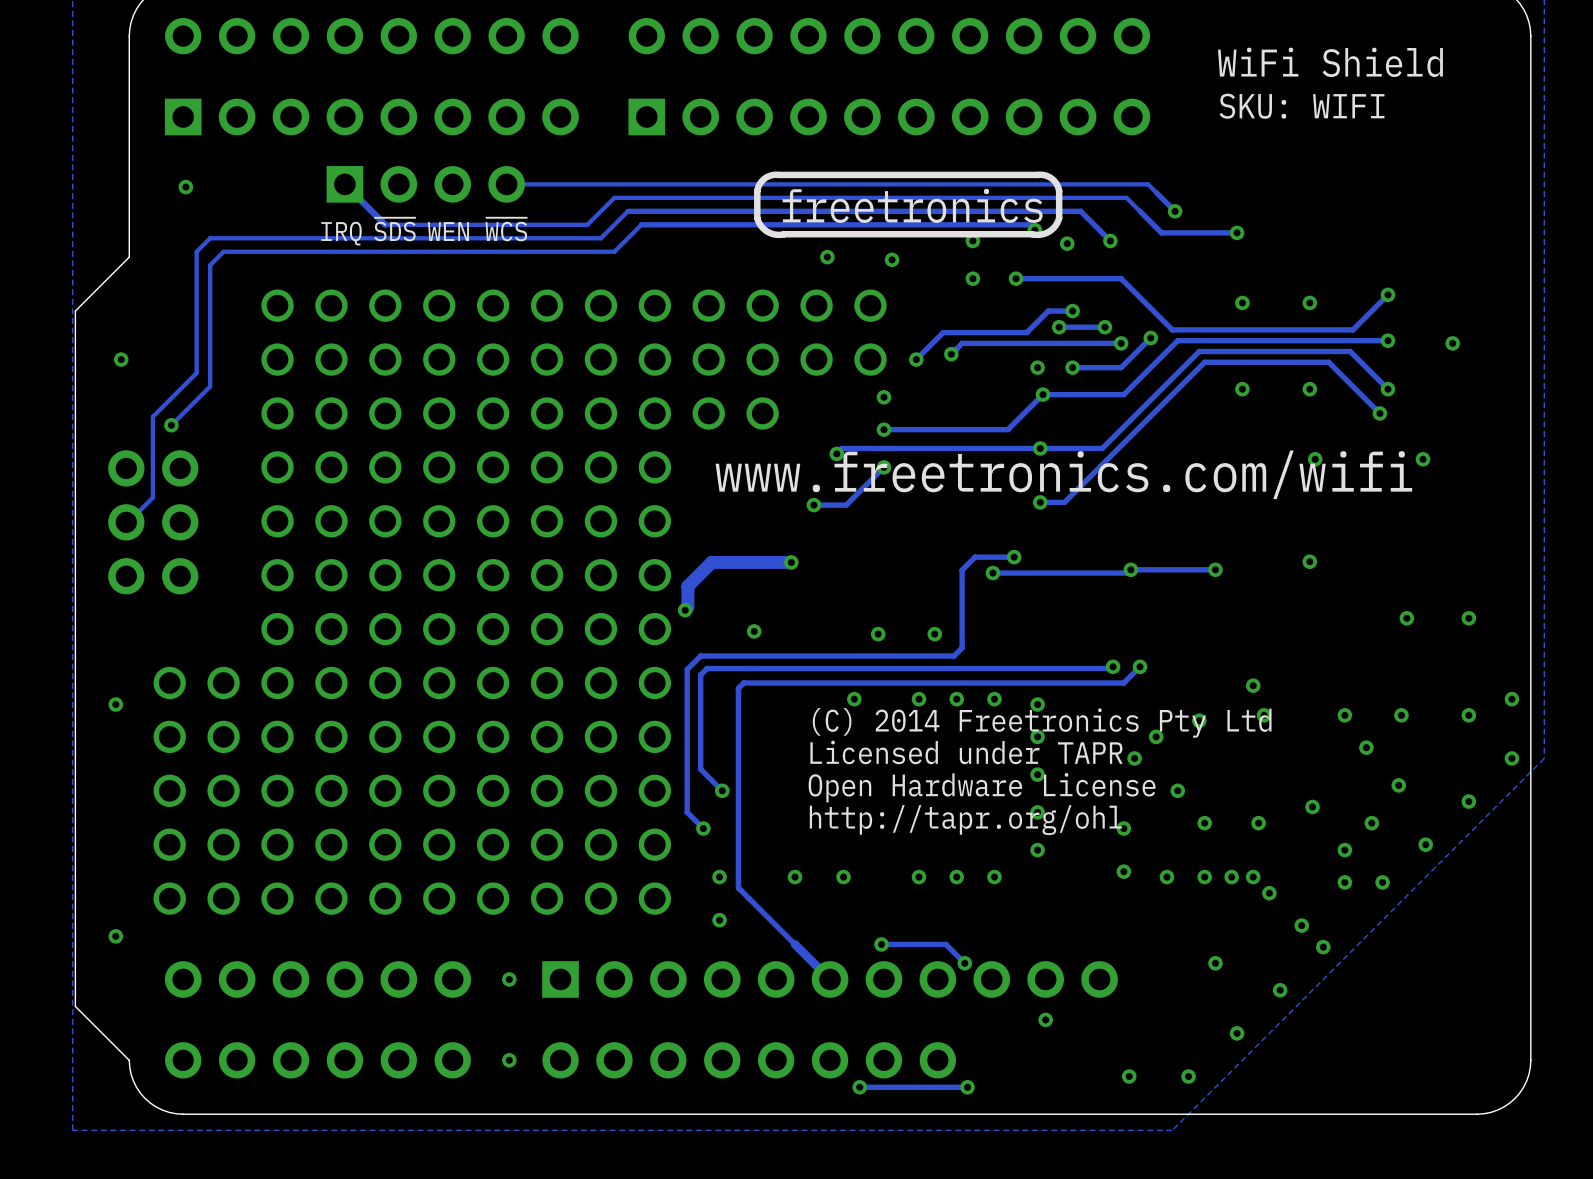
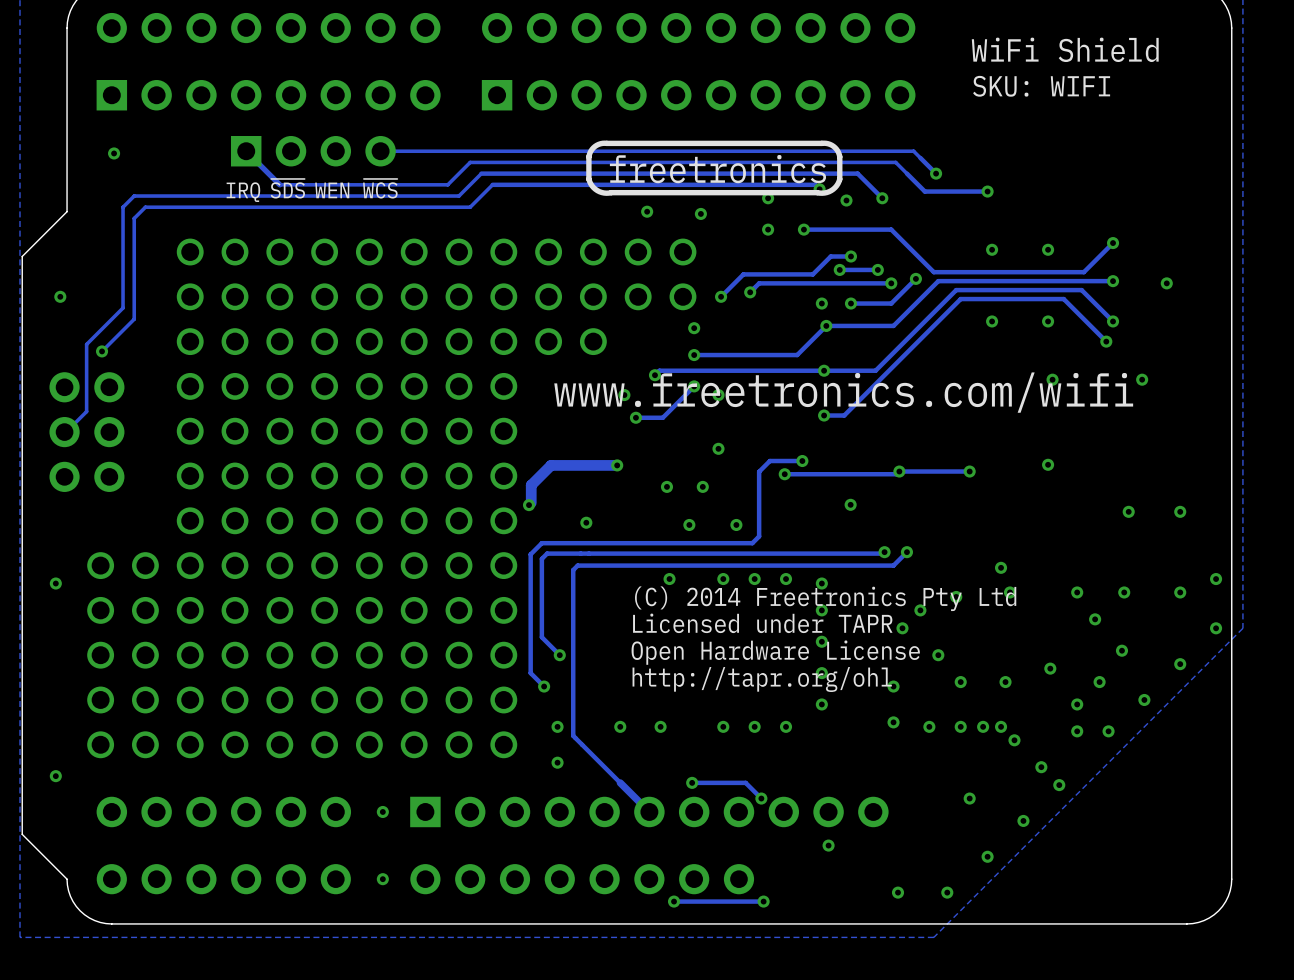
via: none -> (624, 395)
via: none -> (718, 395)
via: none -> (718, 448)
via: none -> (666, 486)
via: none -> (702, 486)
via: none -> (850, 504)

